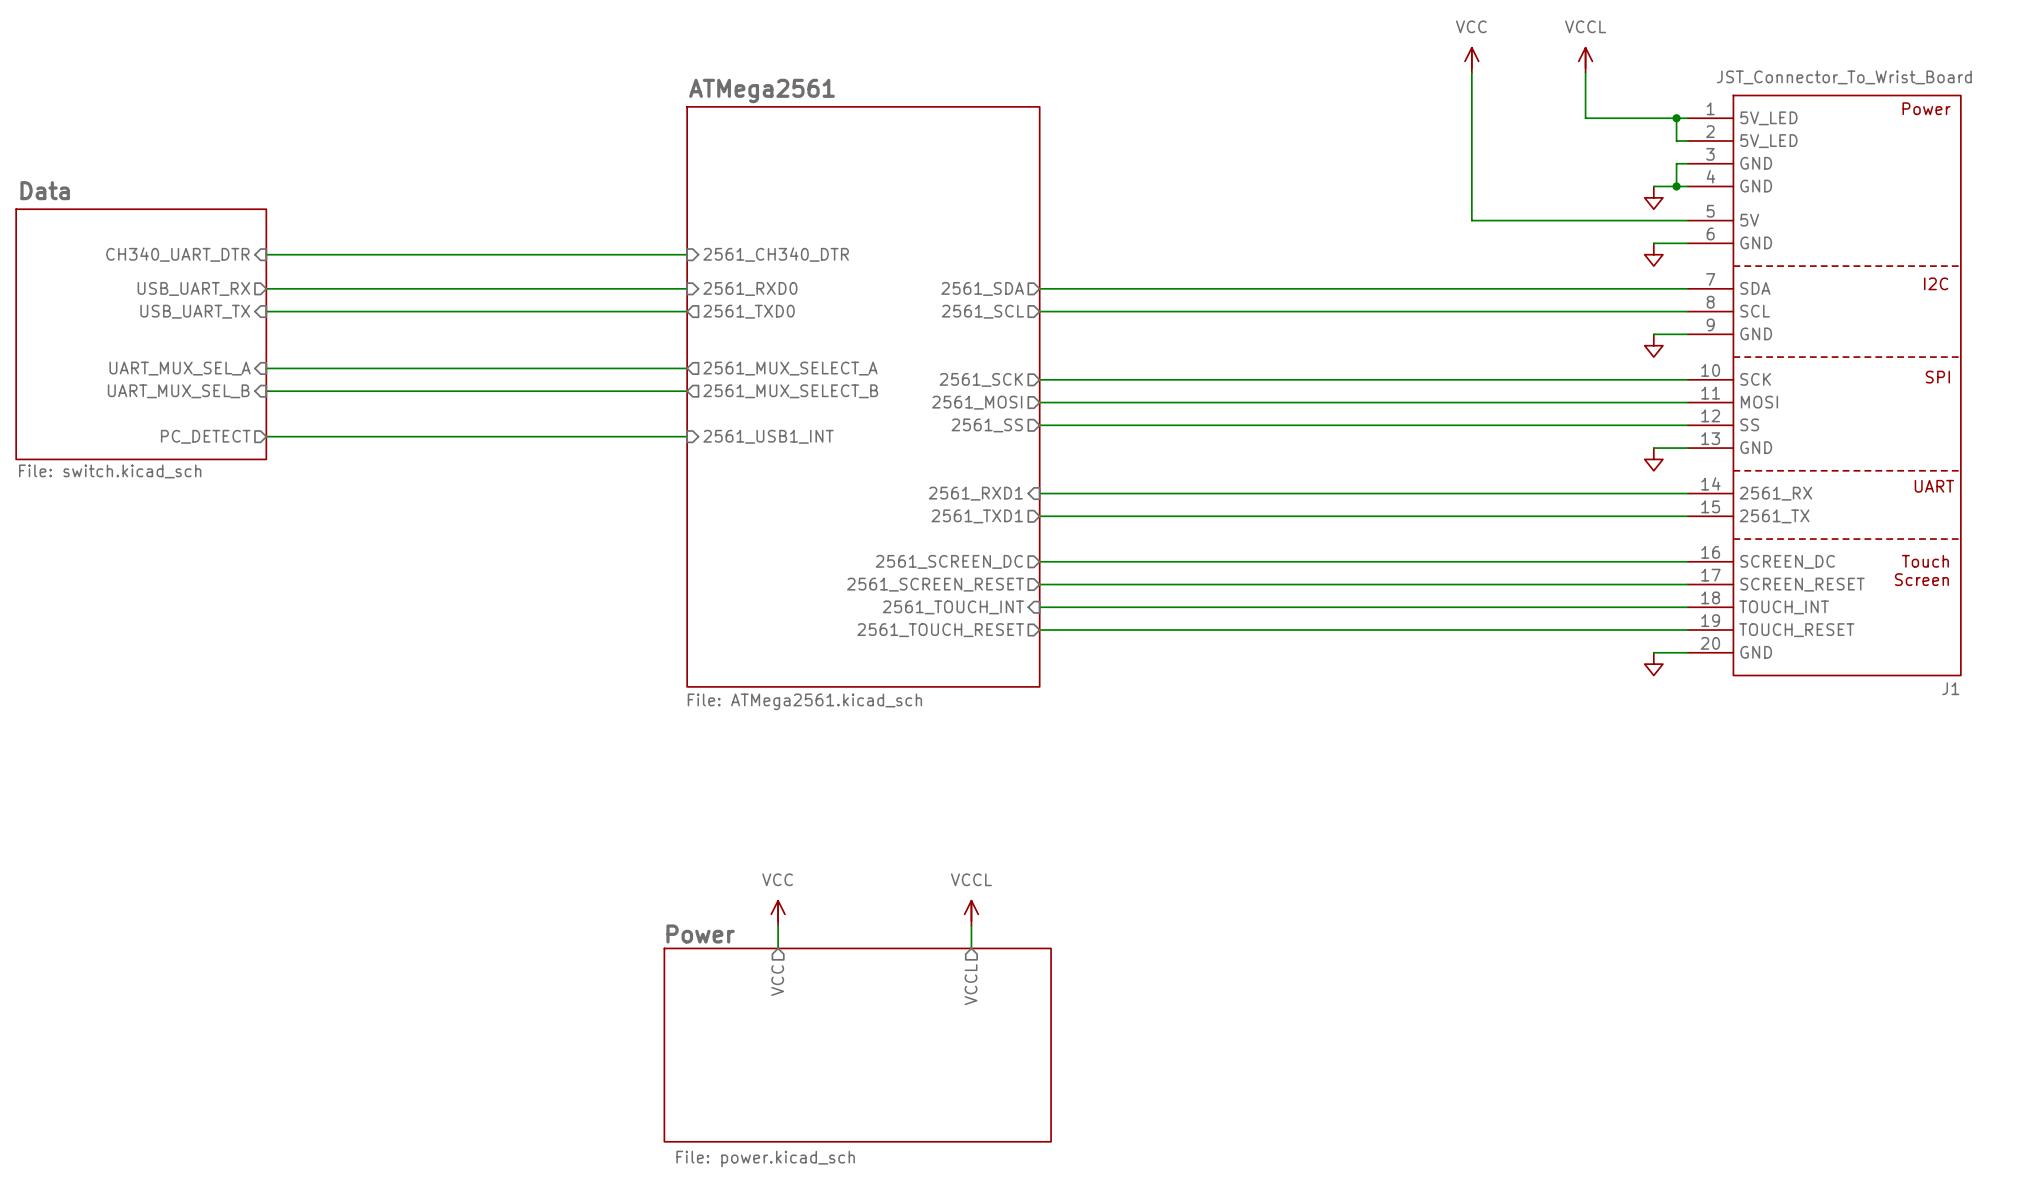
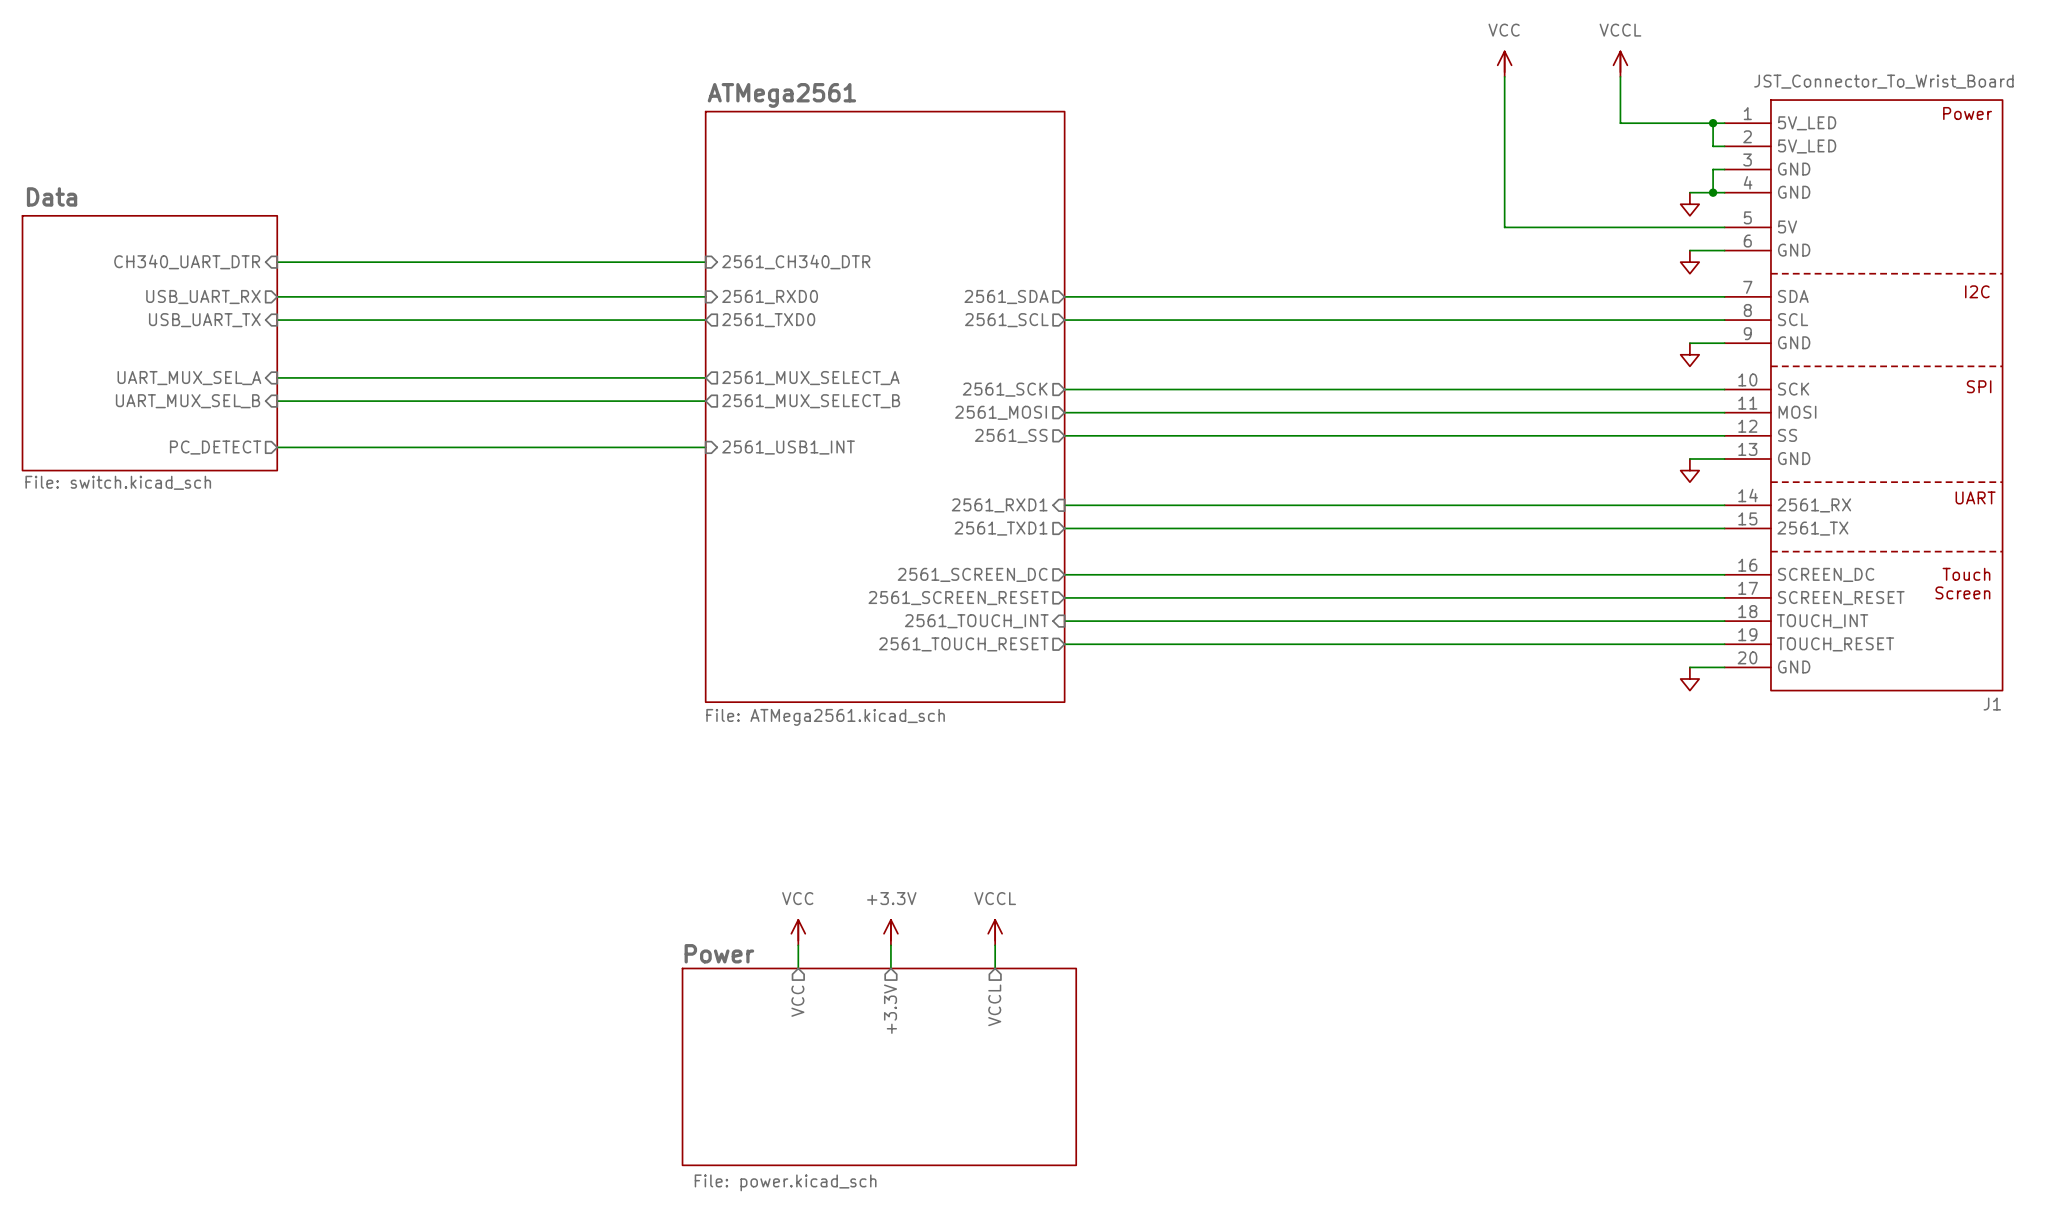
power symbol: none -> +3.3V (890, 932)
wire: none -> (890, 945) (890, 968)
sheet pin: none -> +3.3V (890, 1009)

